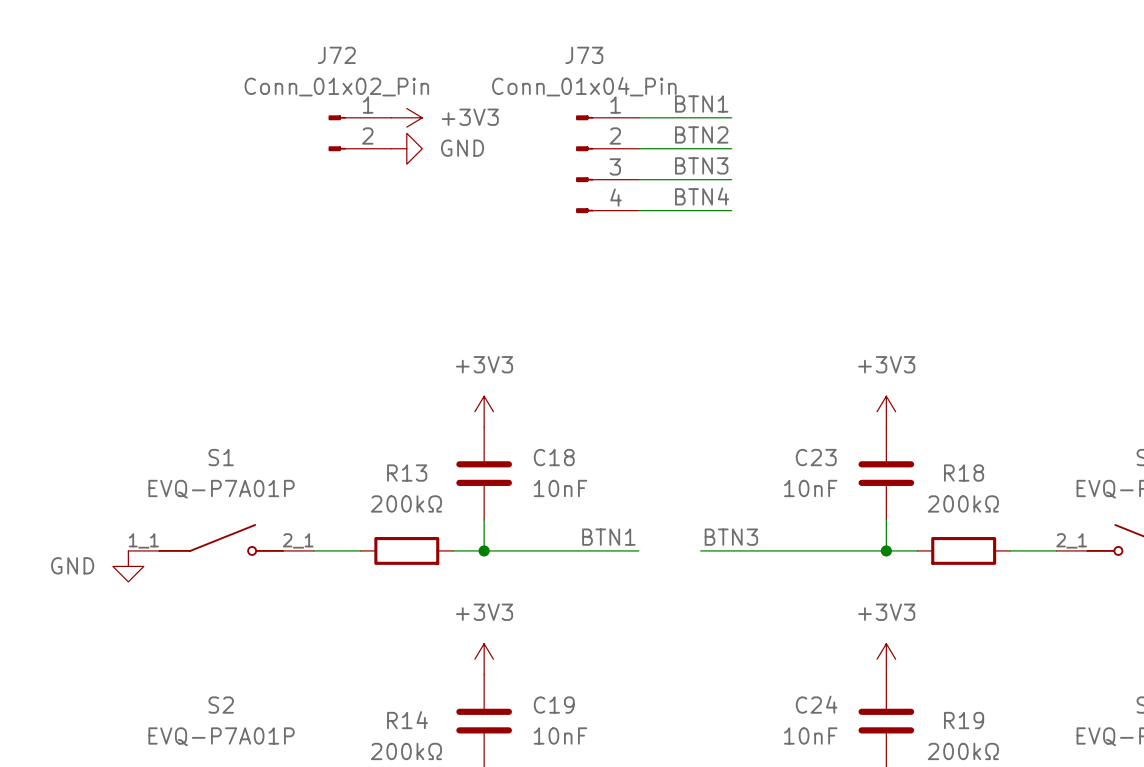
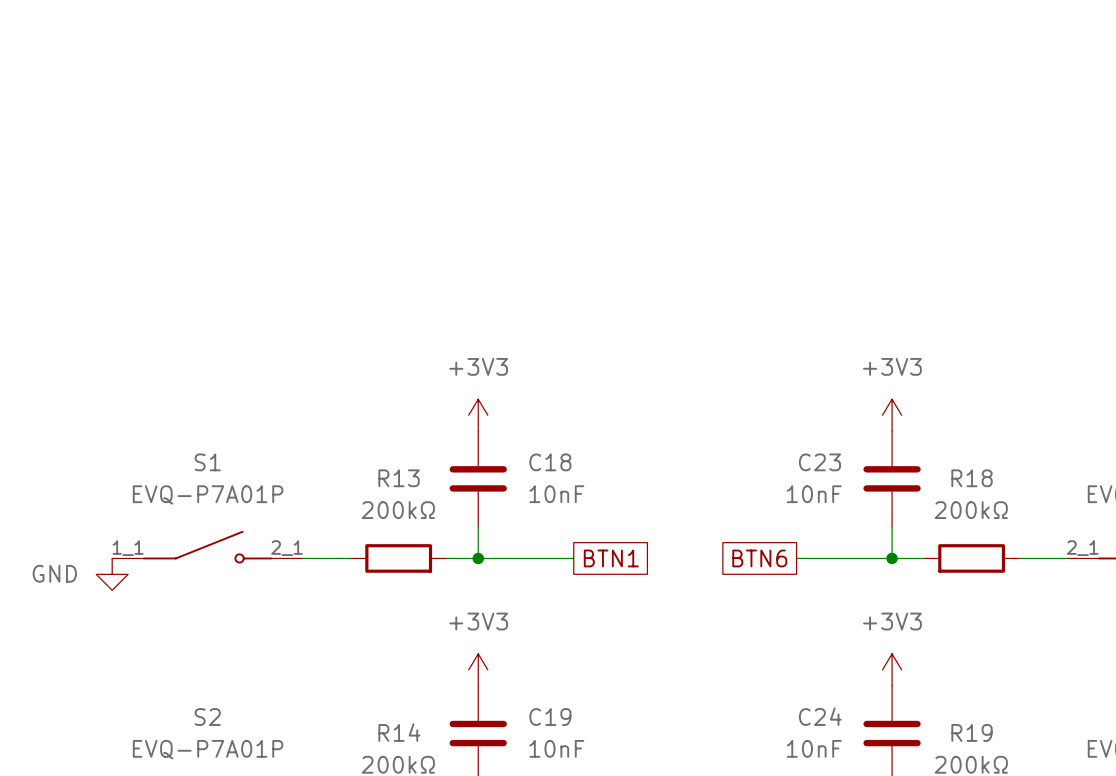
label: BTN1 (701, 104) -> none
power symbol: +3V3 (406, 117) -> none
wire: (638, 117) (731, 117) -> none
J72: Conn_01x02_Pin (359, 133) -> none
label: BTN2 (701, 134) -> none
power symbol: GND (406, 148) -> none
wire: (638, 148) (731, 148) -> none
J73: Conn_01x04_Pin (607, 164) -> none
label: BTN3 (701, 165) -> none
wire: (638, 179) (731, 179) -> none
label: BTN4 (702, 196) -> none
wire: (638, 210) (731, 210) -> none
label: BTN1 (608, 537) -> none
label: BTN3 (731, 537) -> none
wire: (576, 550) (638, 550) -> none
global label: none -> BTN1 (611, 558)
wire: (700, 550) (793, 550) -> none
global label: none -> BTN6 (759, 558)

